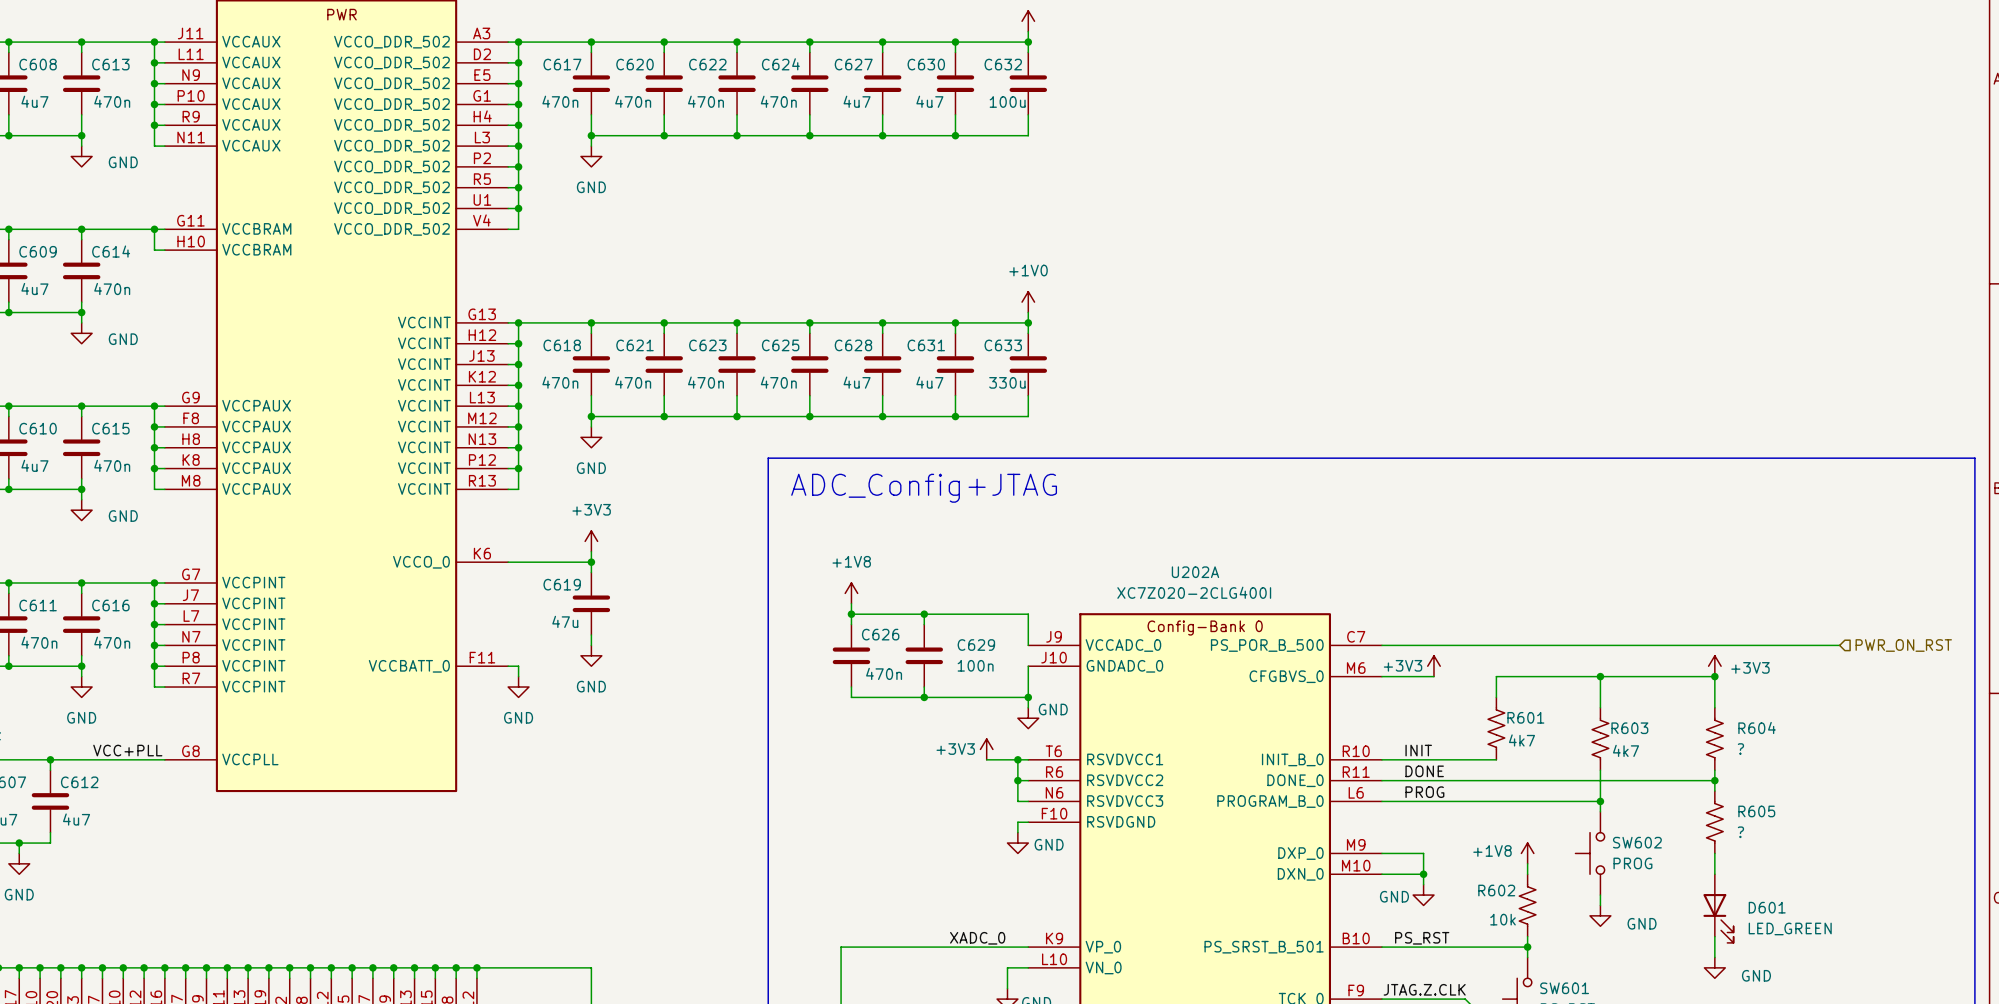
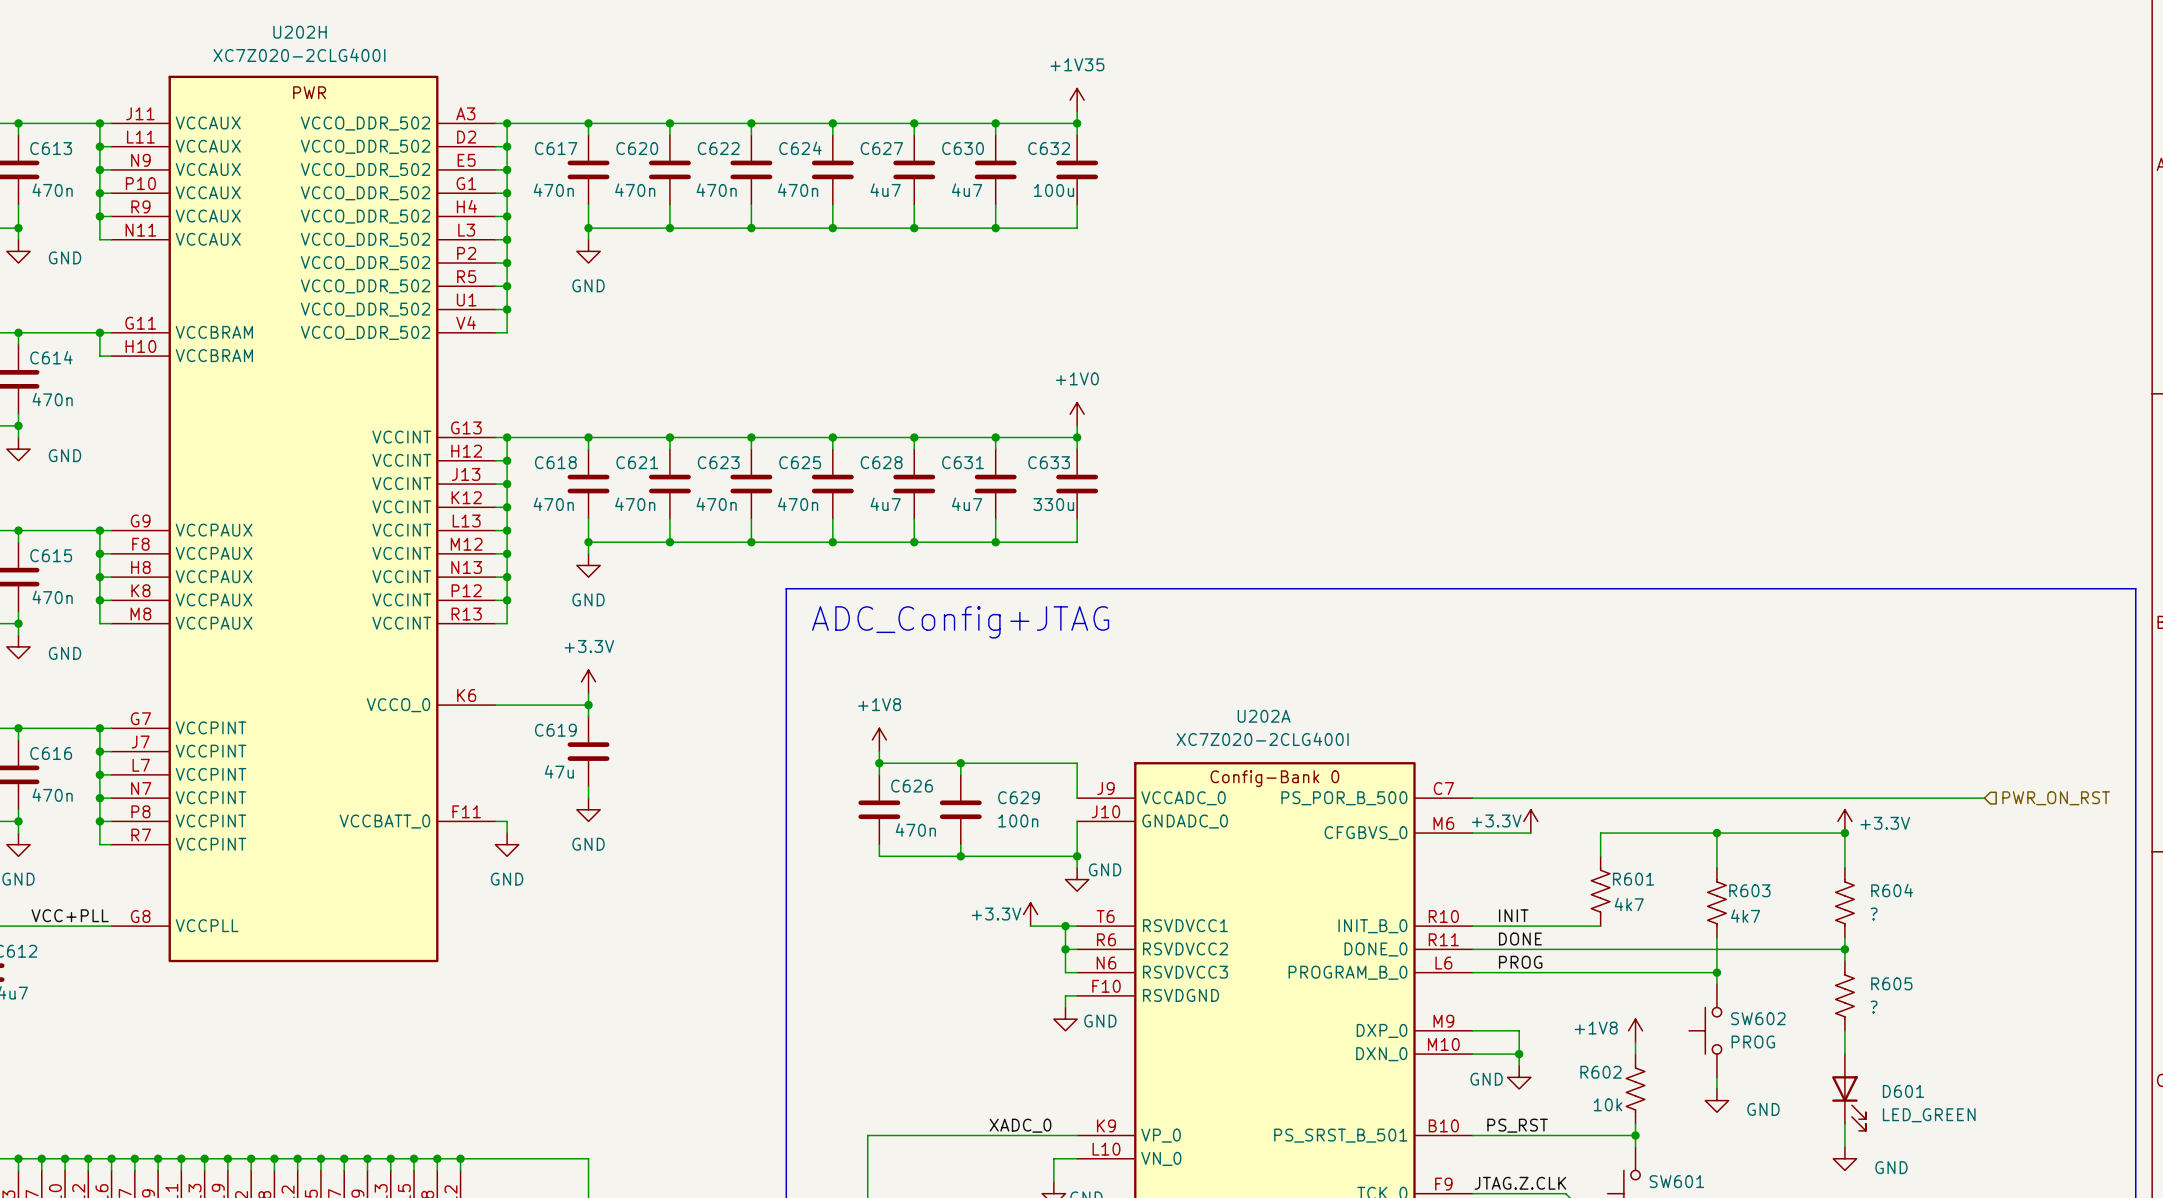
power symbol: +3V3 (591, 541) -> +3.3V (588, 681)
power symbol: +3V3 (1433, 666) -> +3.3V (1530, 821)
power symbol: +3V3 (1714, 666) -> +3.3V (1844, 821)
power symbol: +3V3 (986, 749) -> +3.3V (1030, 914)

